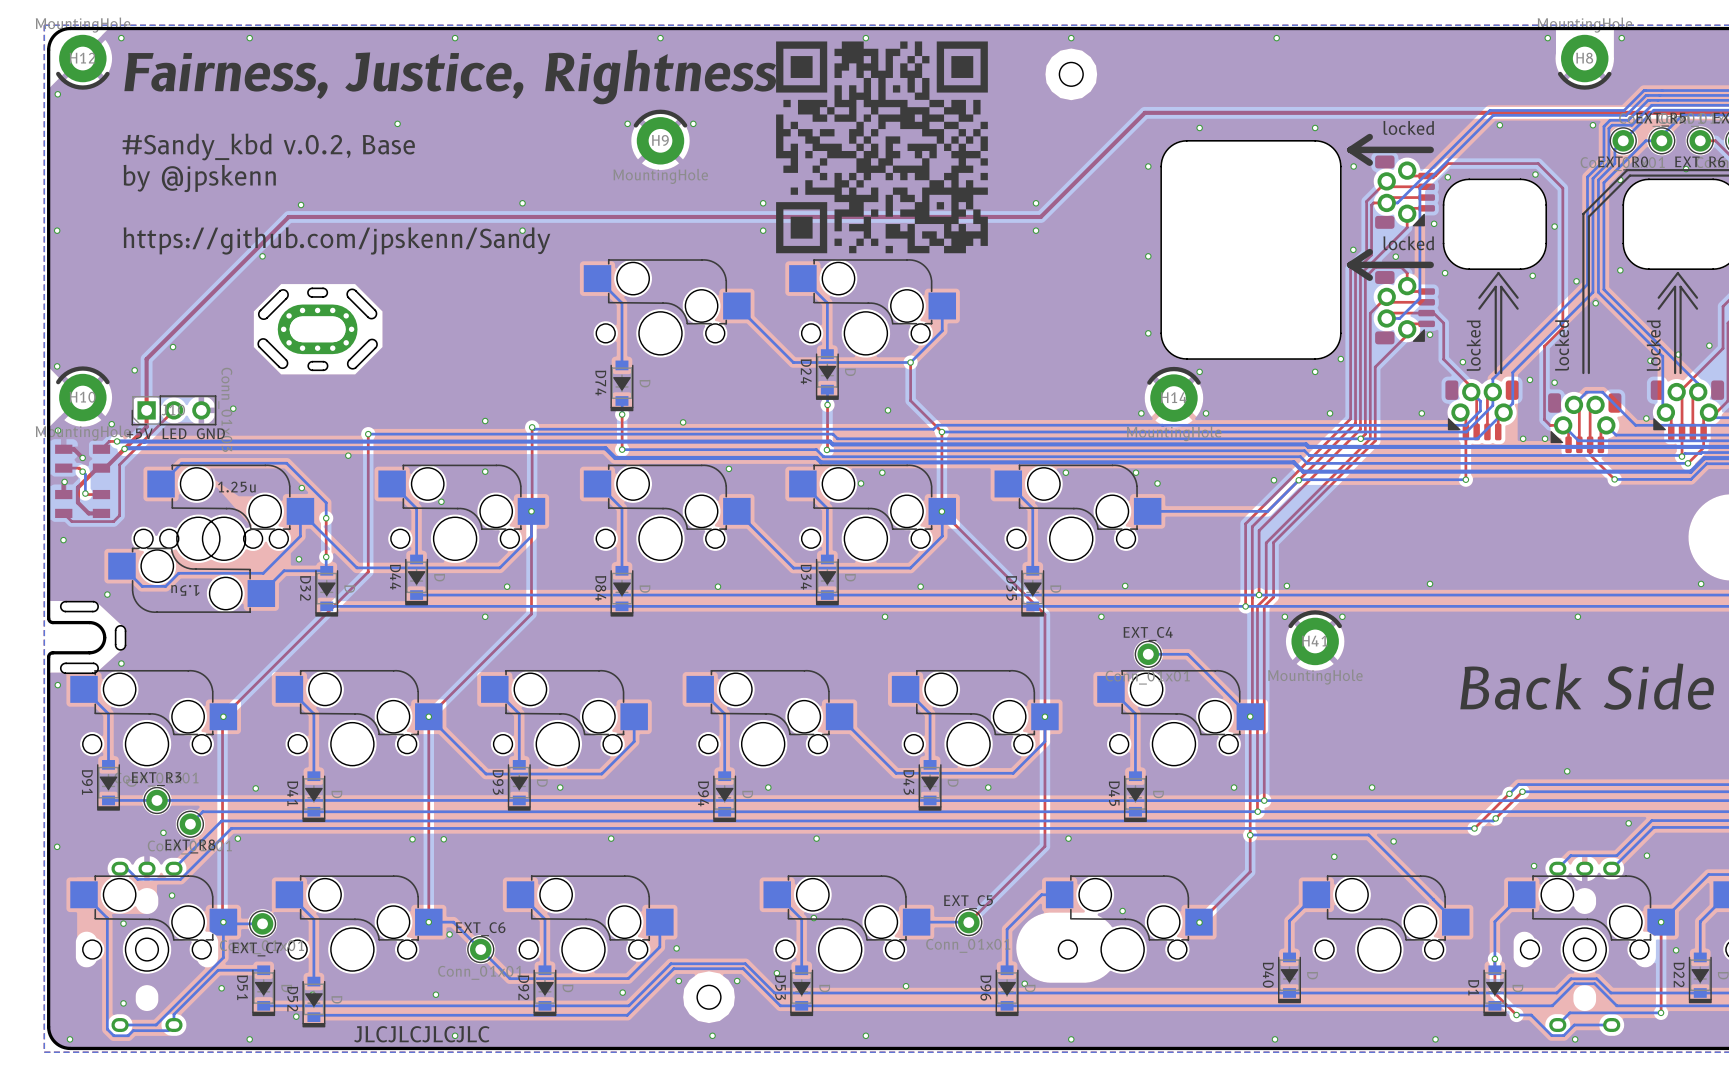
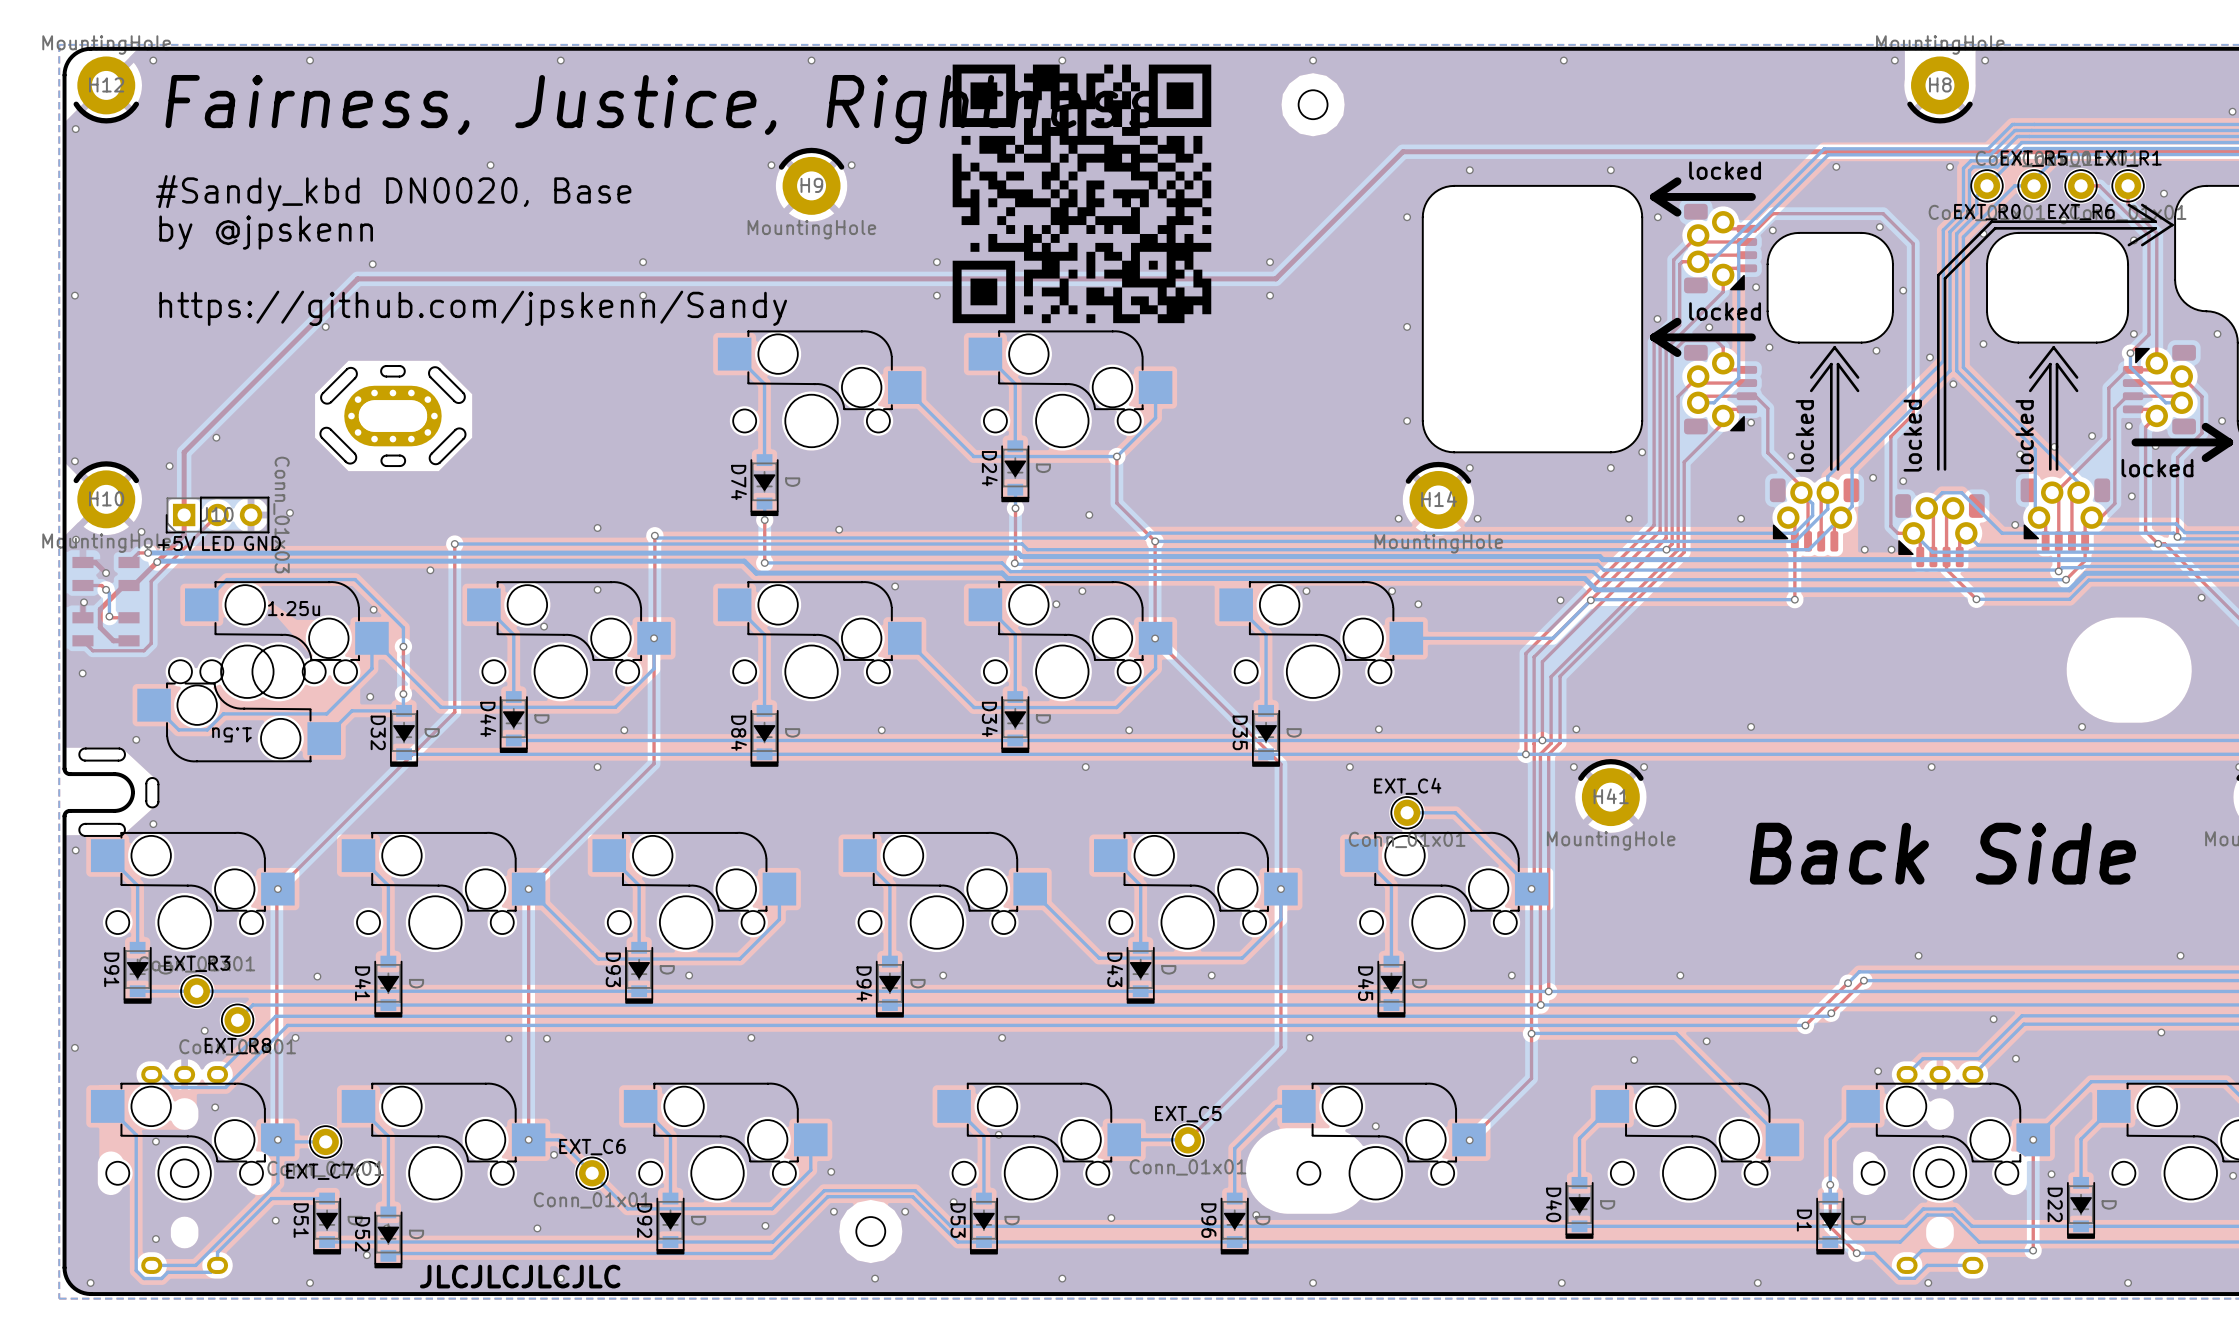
text: #Sandy_kbd v.0.2, Base (268, 146) -> #Sandy_kbd DN0020, Base (393, 193)

